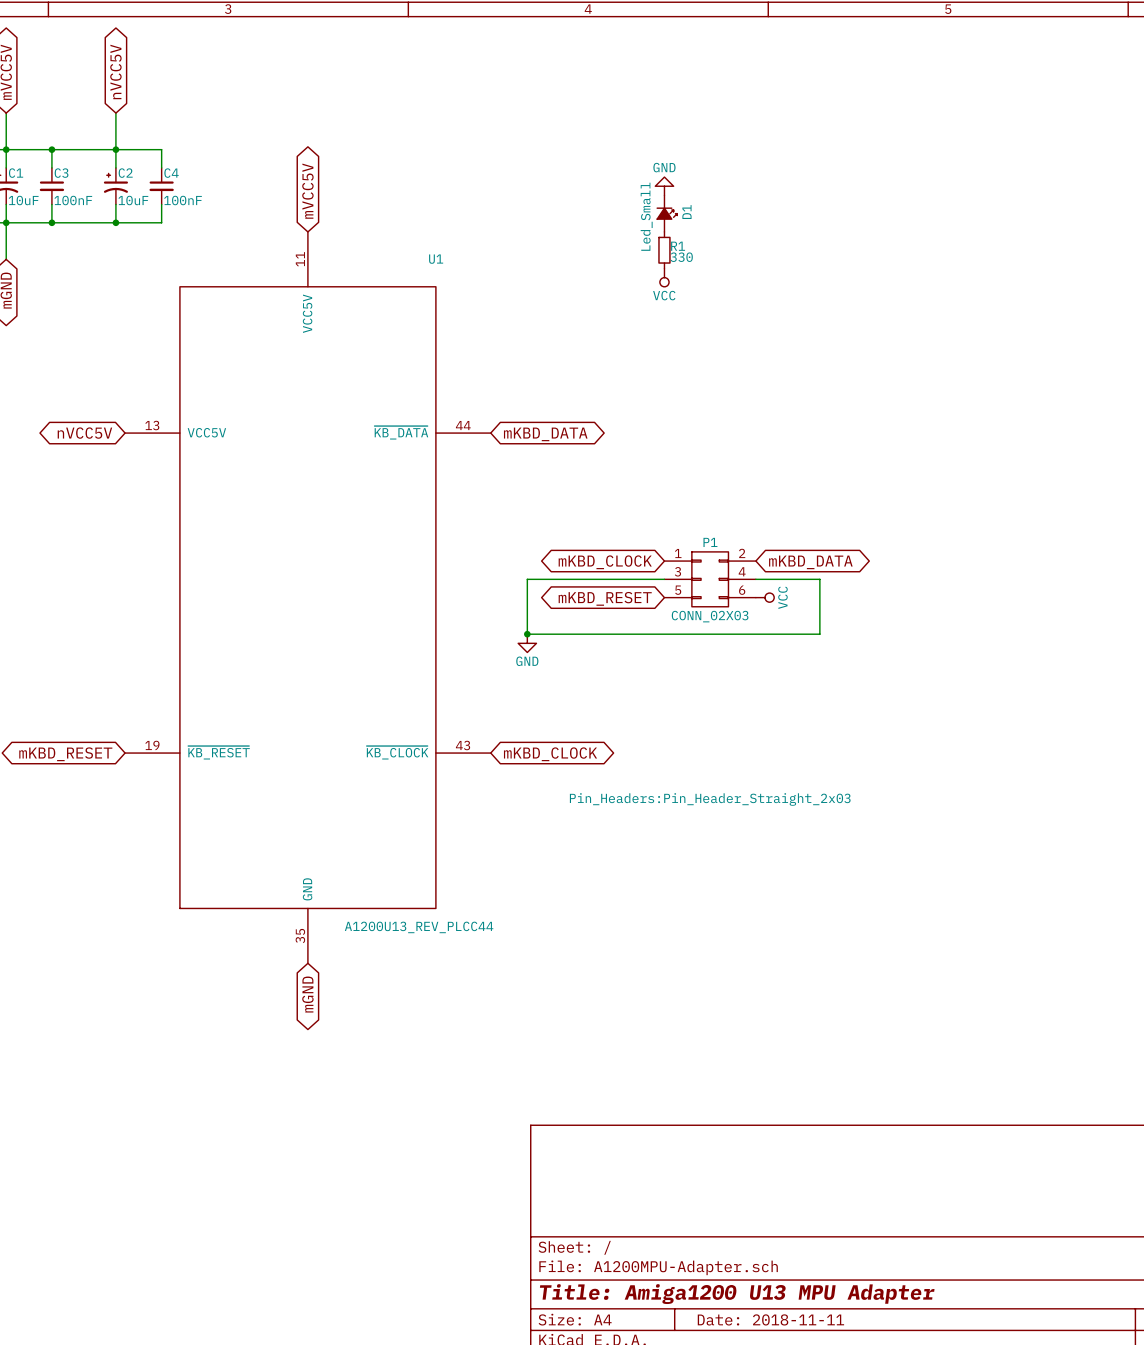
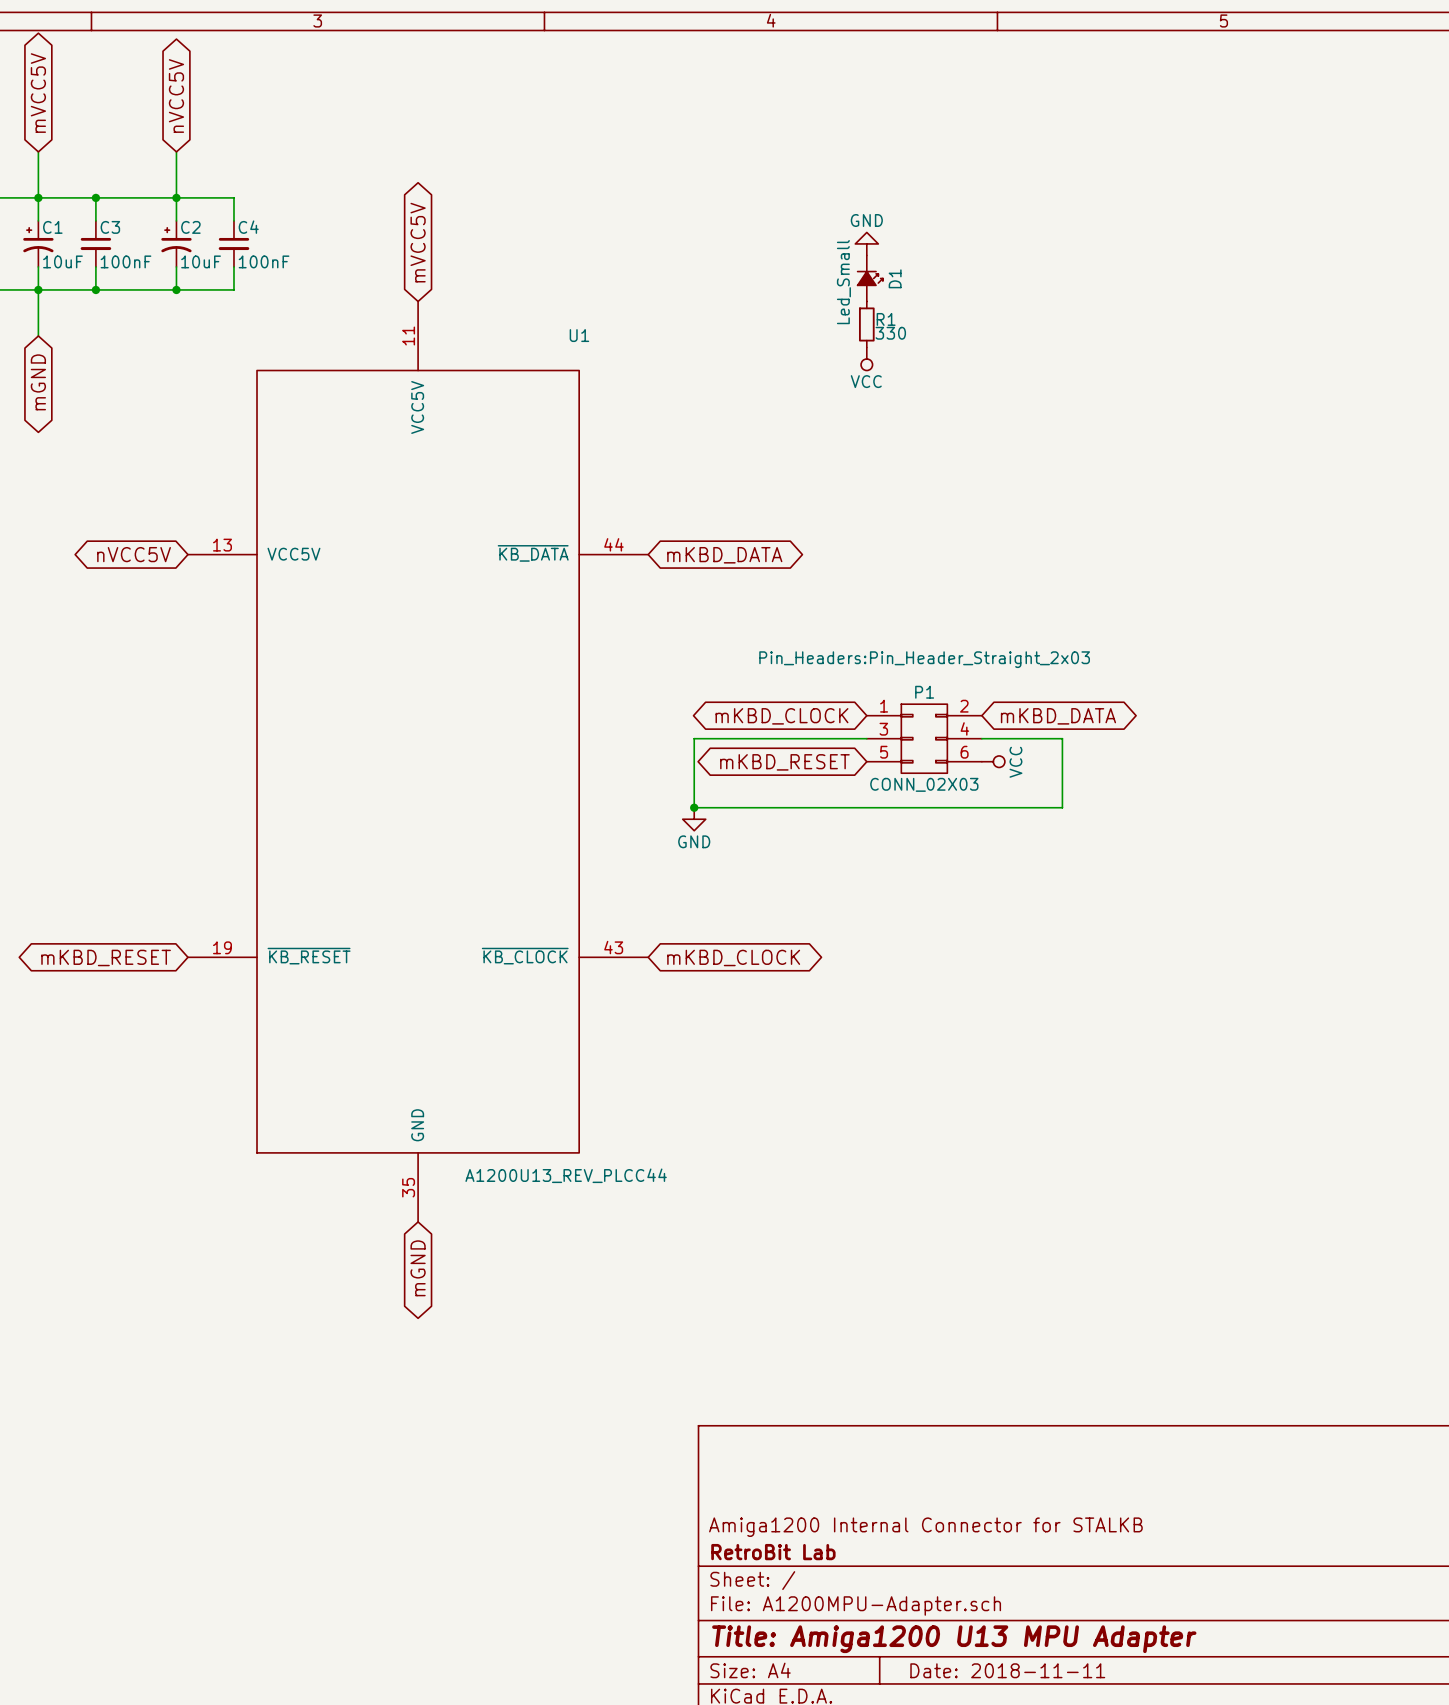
P1 text position: Pin_Headers:Pin_Header_Straight_2x03 (710, 799) -> Pin_Headers:Pin_Header_Straight_2x03 (924, 659)
title block: none -> Amiga1200 Internal Connector for STALKB (925, 1527)
title block: none -> RetroBit Lab (773, 1552)

